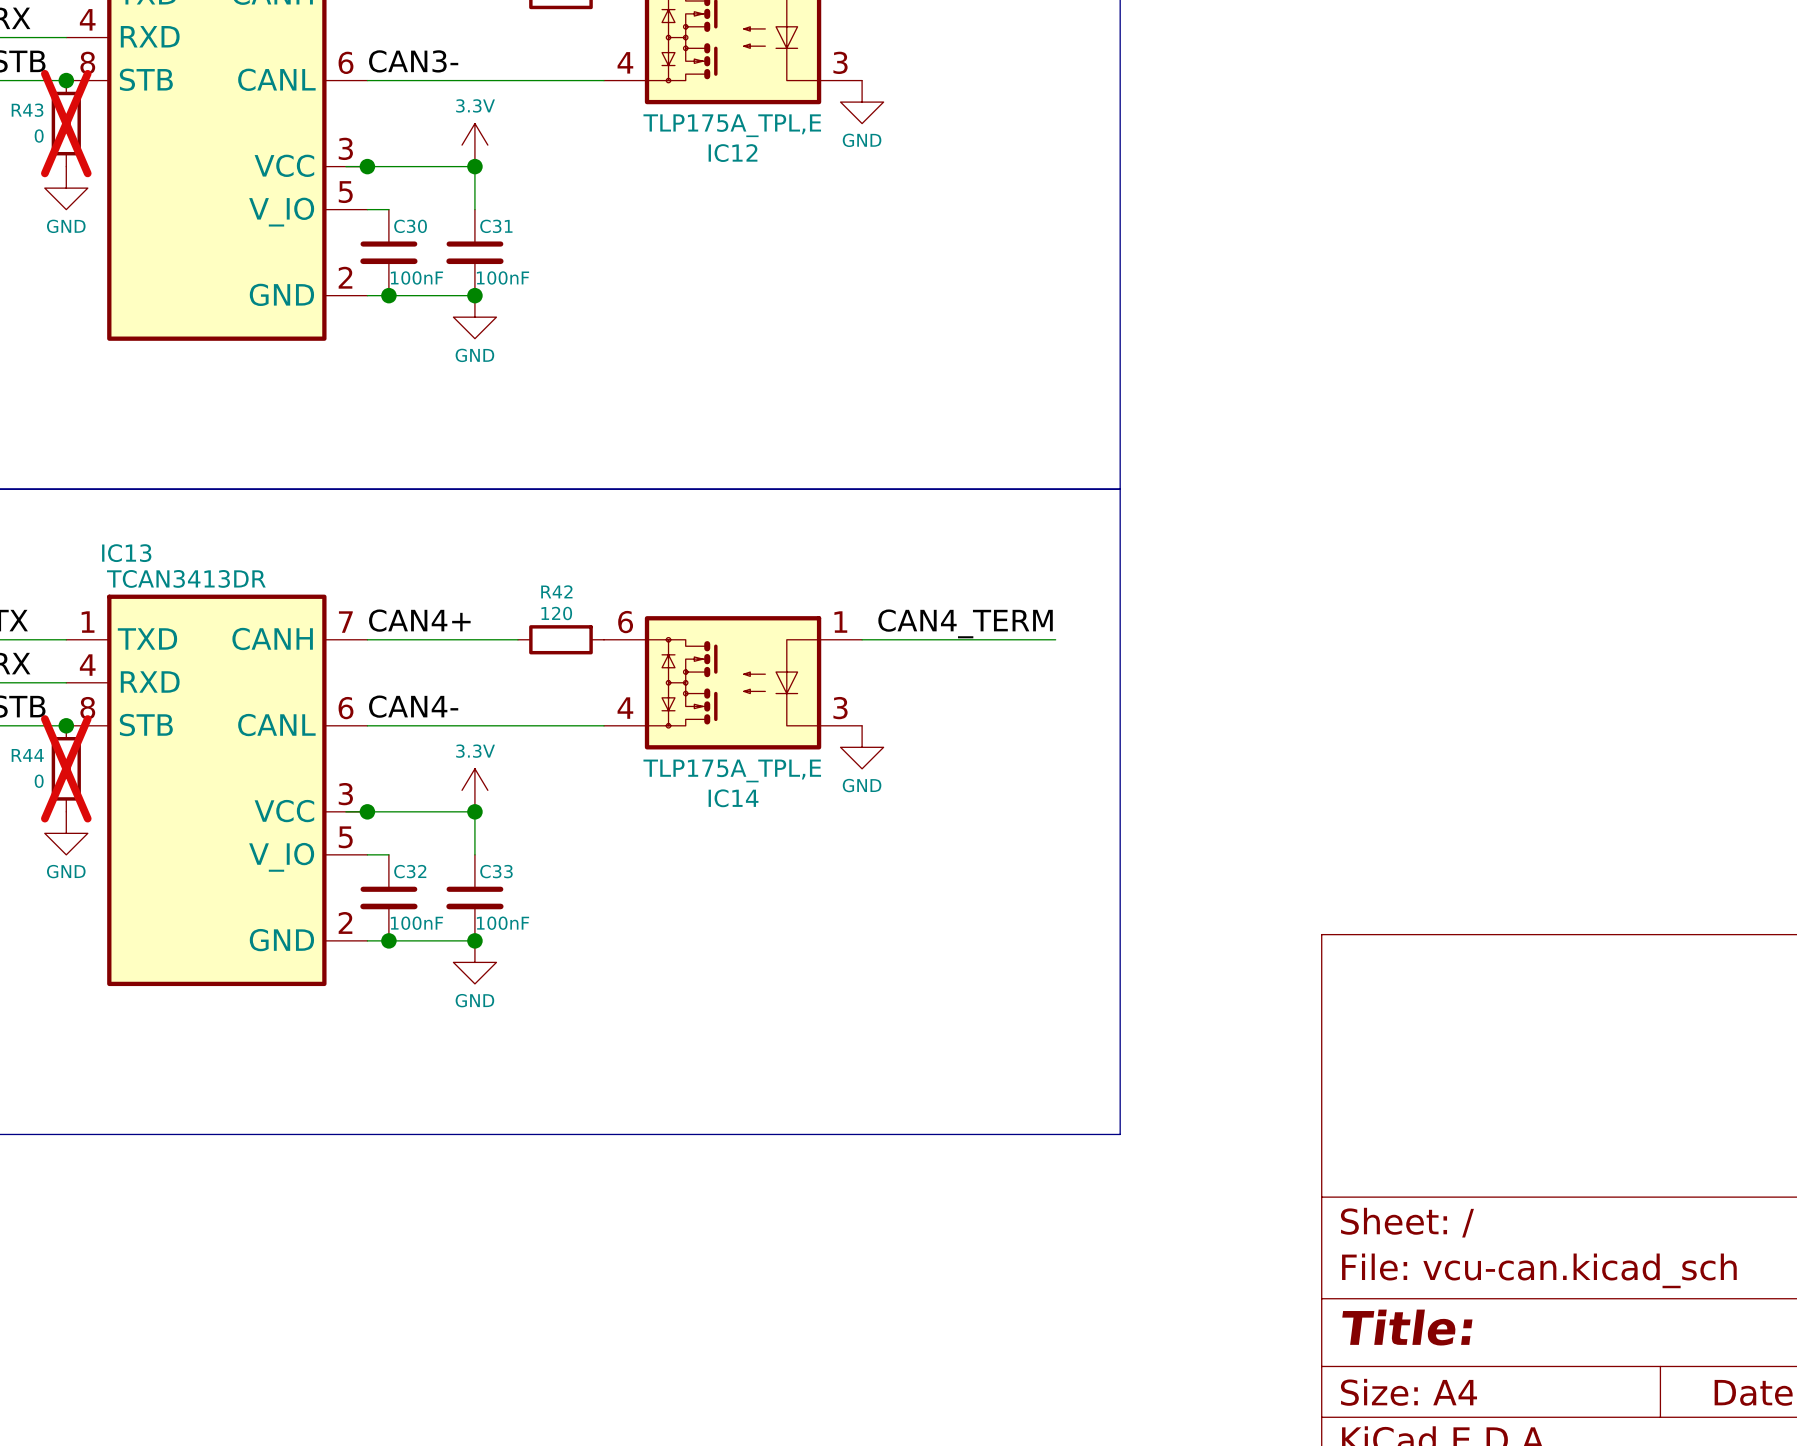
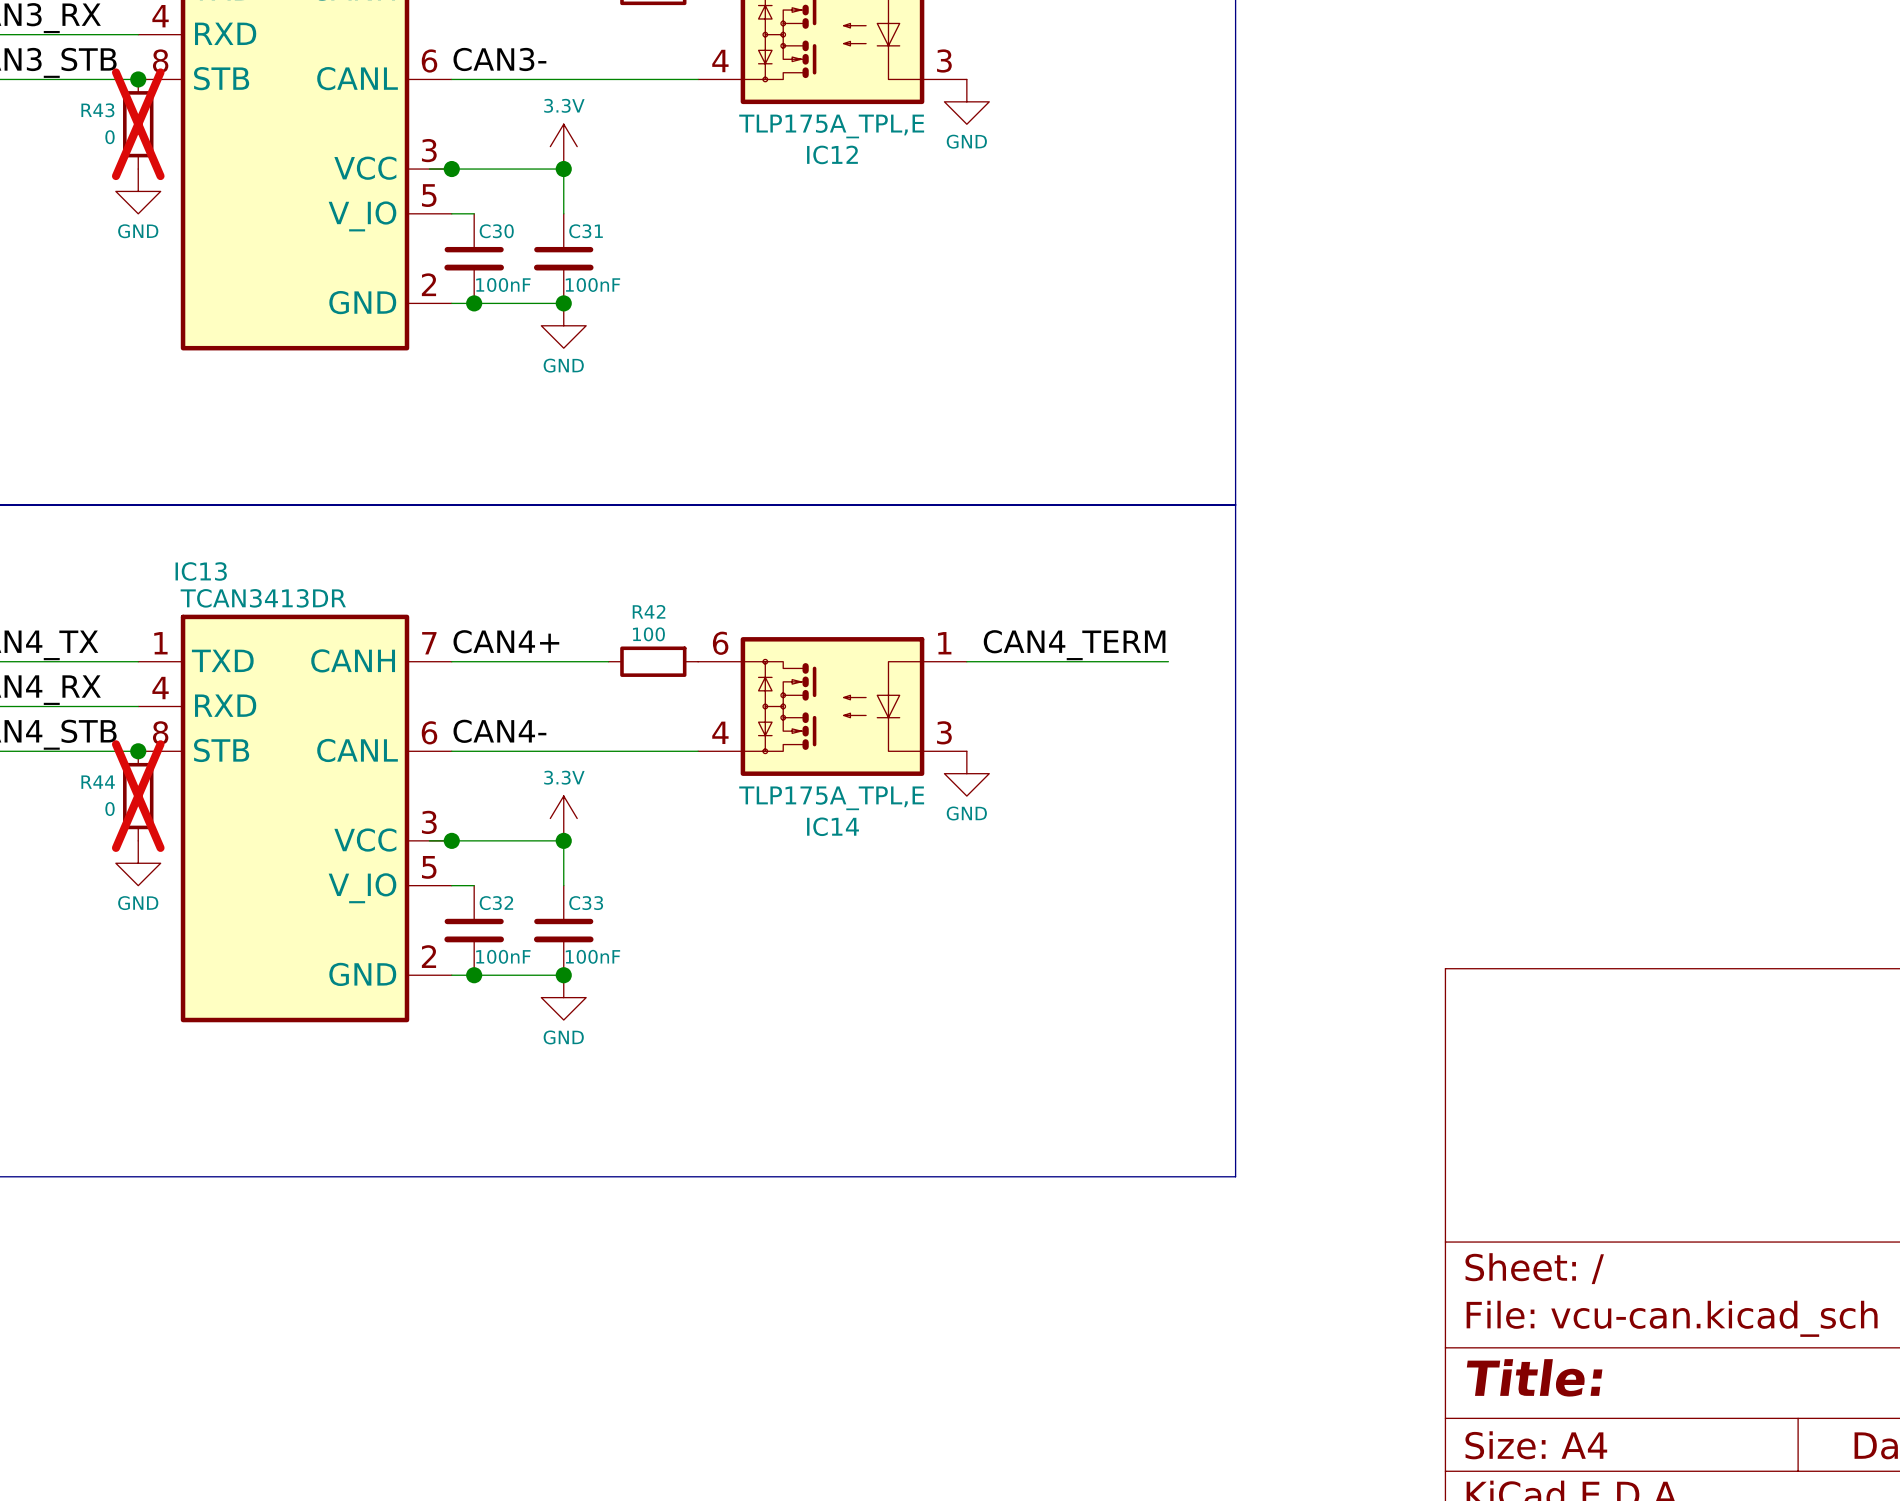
R42 value: 120 (556, 613) -> 100 (648, 634)

